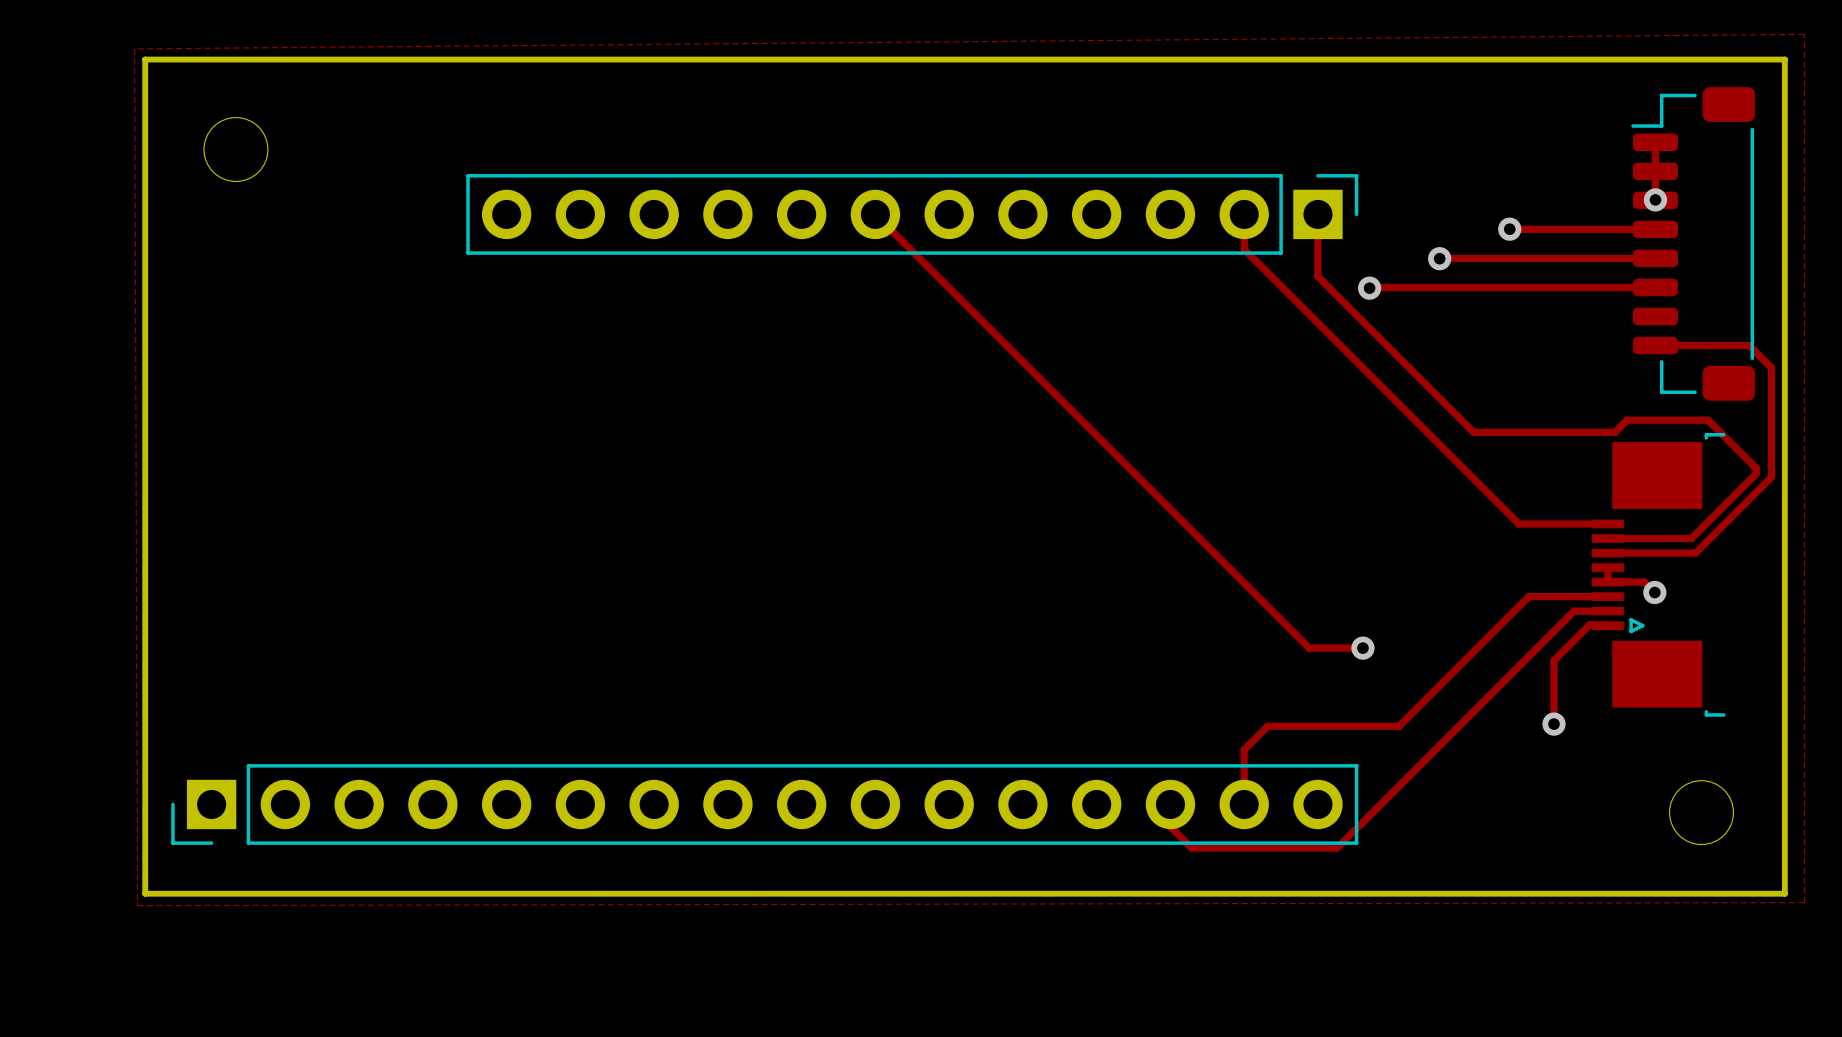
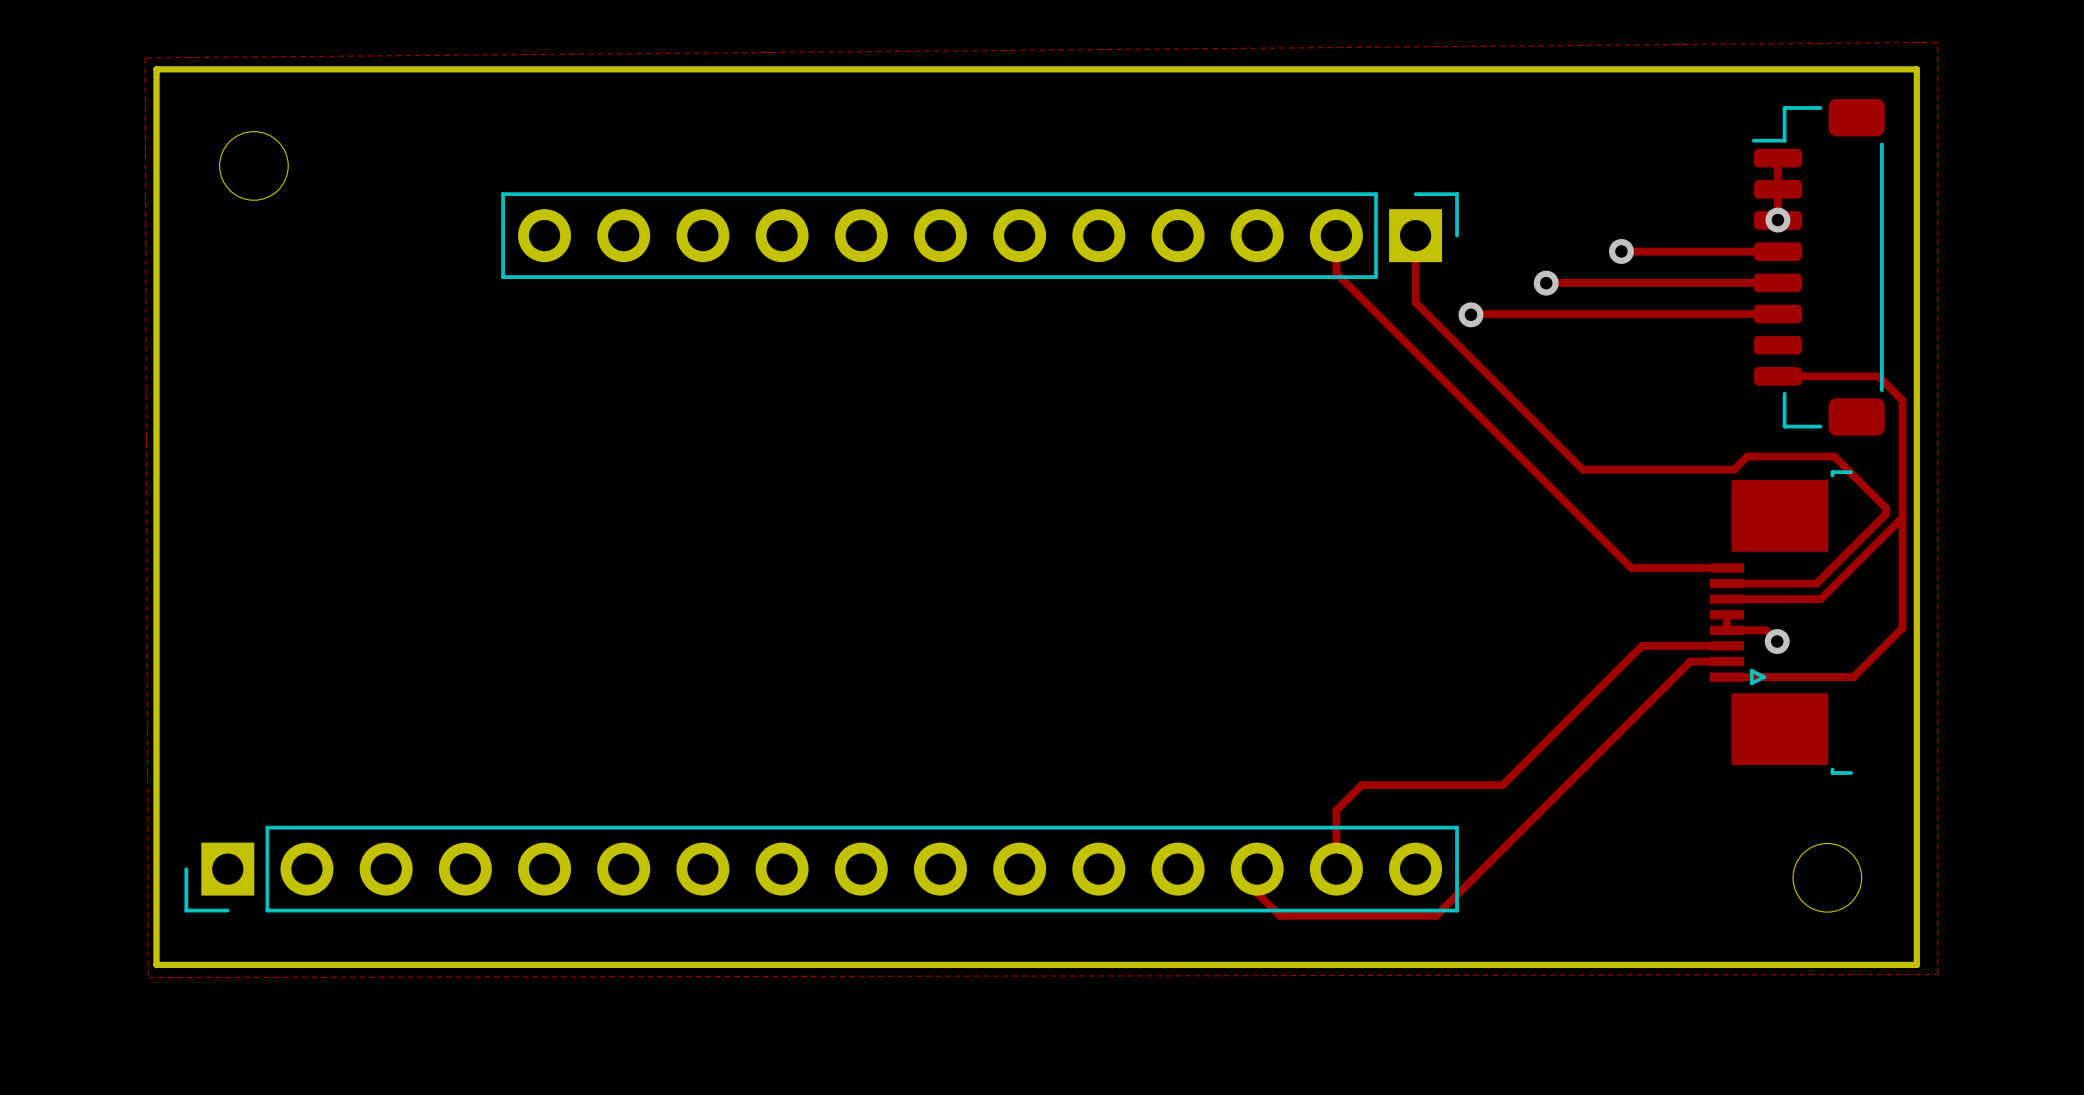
track: (875, 214) (1309, 648) (1364, 648) -> none
track: (1607, 625) (1589, 624) (1554, 660) (1554, 724) -> (1726, 677) (1853, 677) (1902, 628) (1902, 517)
via: (1362, 648) -> none
via: (1554, 724) -> none

